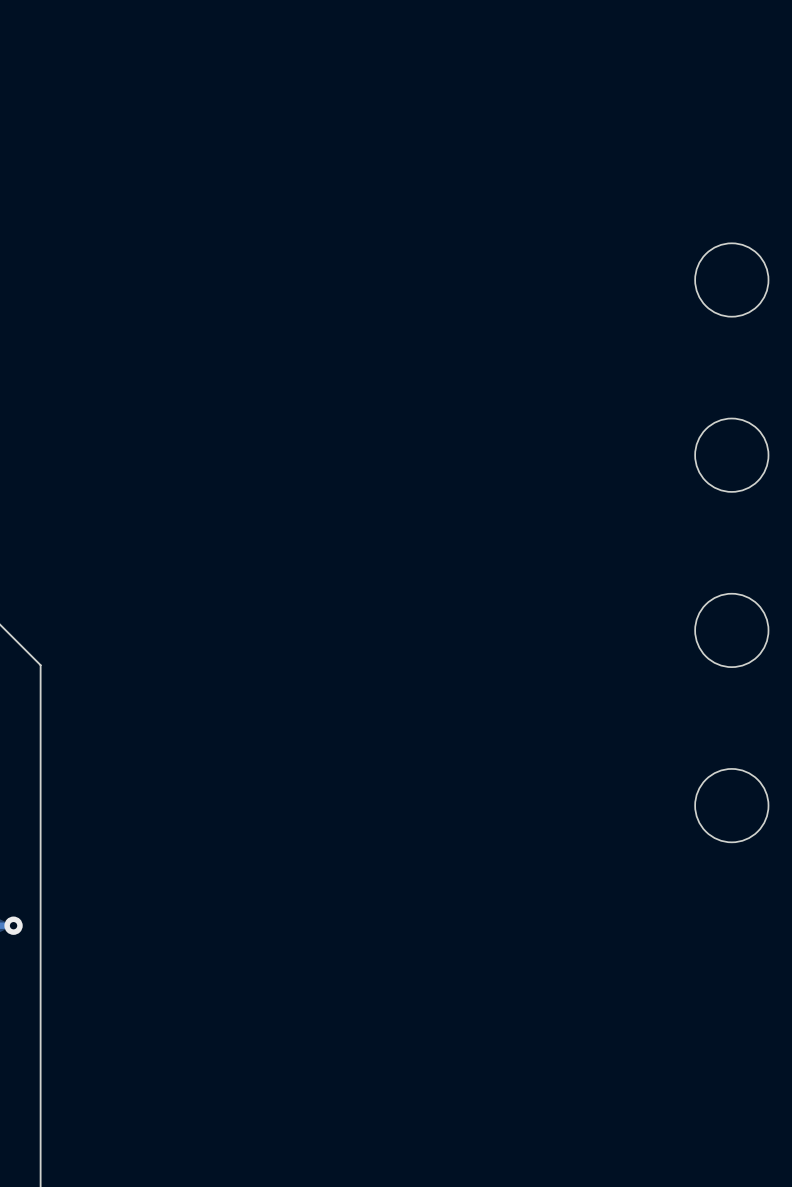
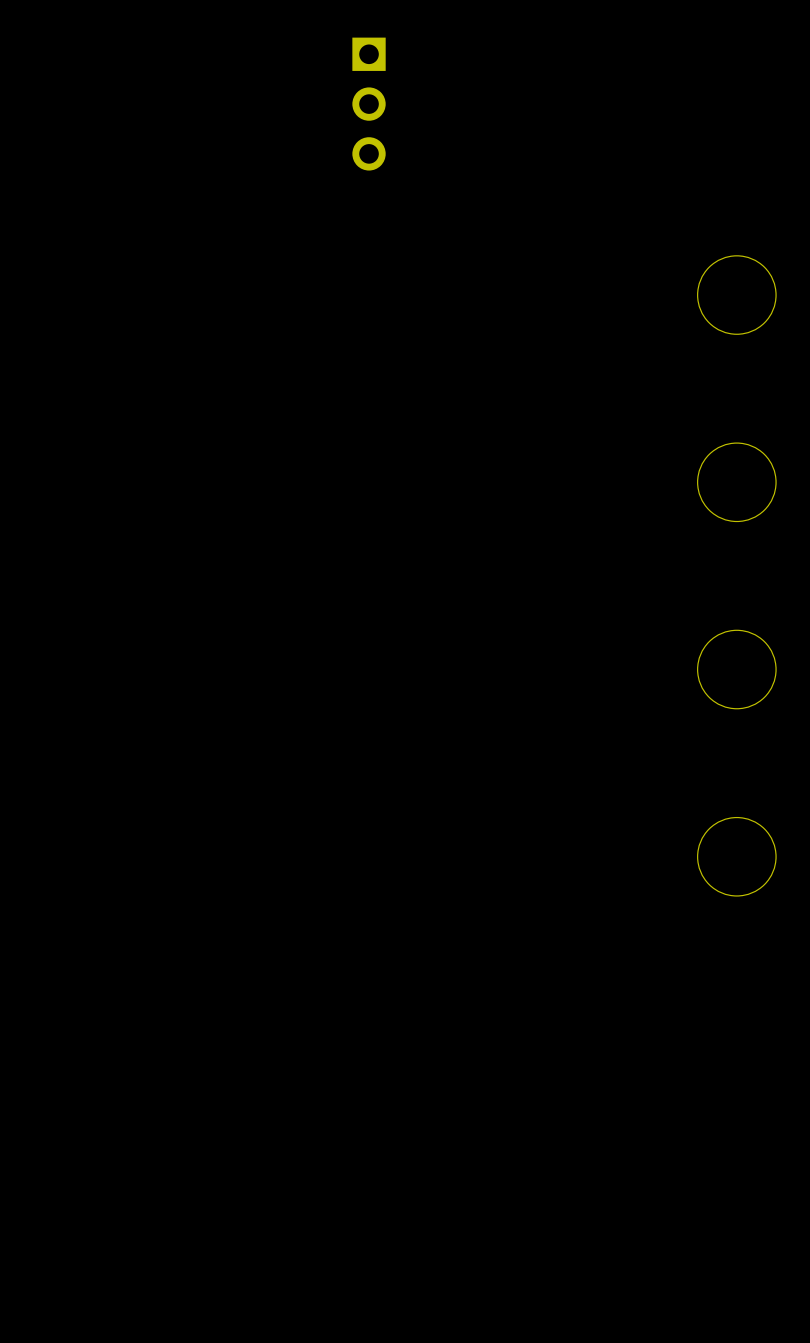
part: none -> (369, 104)

